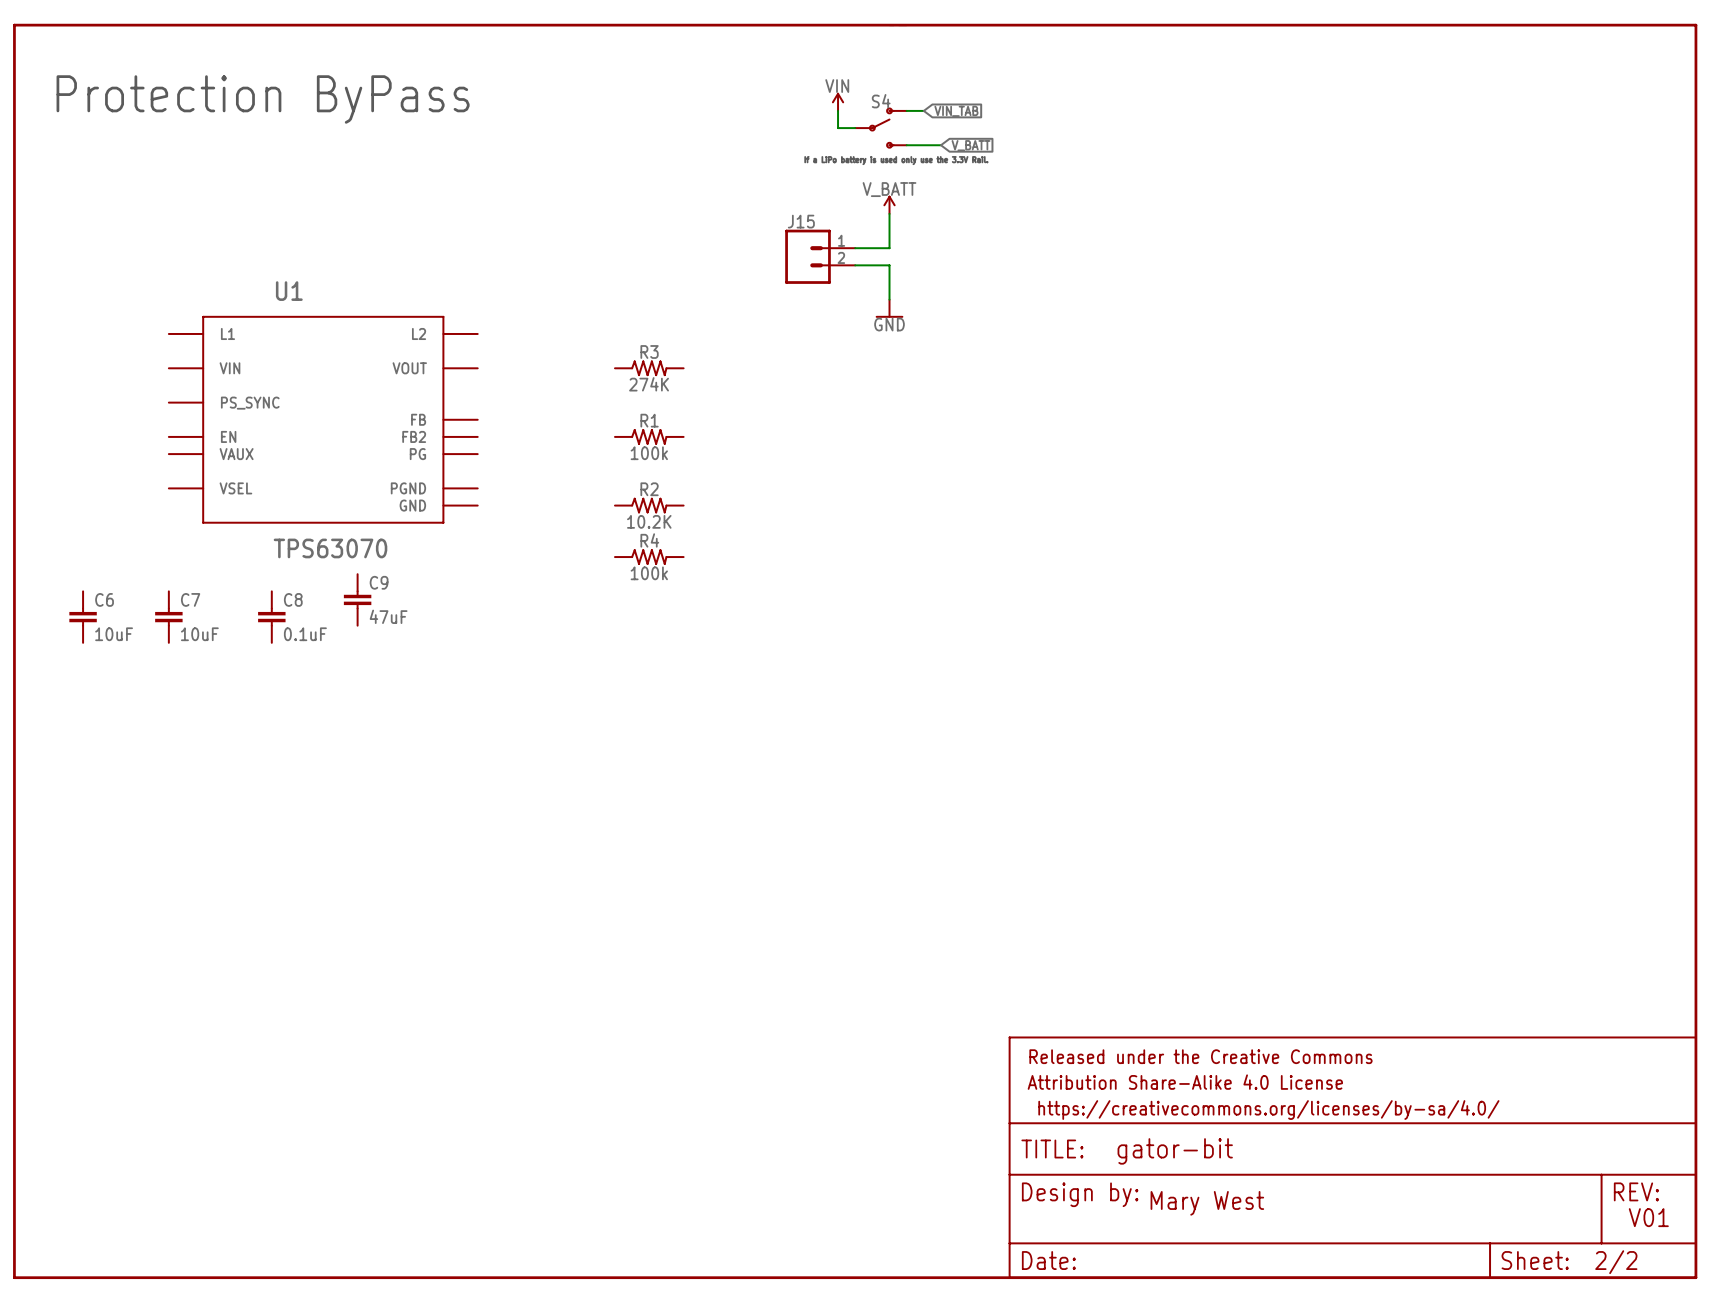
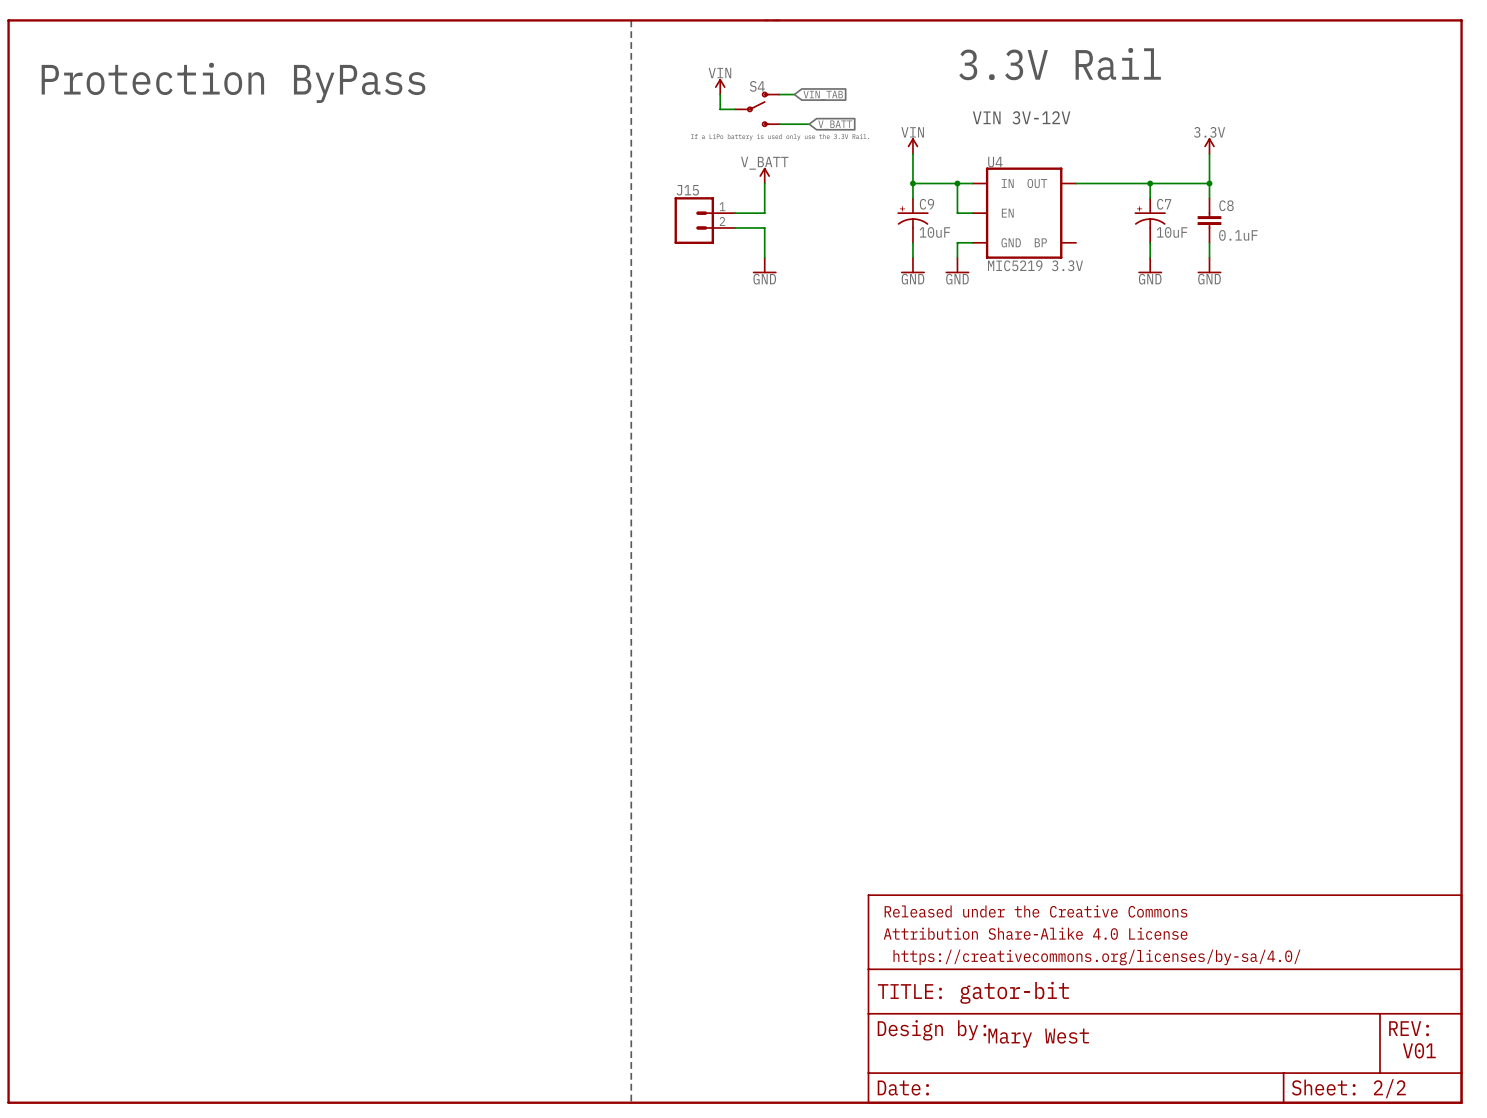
line: none -> (631, 20) (631, 1102)
text: none -> 3.3V Rail (1060, 64)
text: none -> VIN 3V-12V (1021, 117)
power symbol: none -> VIN (912, 146)
power symbol: none -> 3.3V (1209, 146)
wire: none -> (912, 153) (912, 198)
wire: none -> (1209, 153) (1209, 198)
wire: none -> (912, 183) (972, 183)
junction: none -> (912, 183)
wire: none -> (957, 183) (957, 213) (972, 213)
junction: none -> (957, 183)
wire: none -> (1076, 183) (1209, 183)
wire: none -> (1150, 183) (1150, 198)
junction: none -> (1150, 183)
junction: none -> (1209, 183)
U4: none -> MIC5219 3.3V (1024, 213)
wire: none -> (912, 242) (912, 257)
wire: none -> (972, 242) (957, 242) (957, 257)
wire: none -> (1150, 242) (1150, 257)
wire: none -> (1209, 242) (1209, 257)
power symbol: none -> GND (912, 265)
power symbol: none -> GND (957, 265)
power symbol: none -> GND (1150, 265)
power symbol: none -> GND (1209, 265)
R3: 274K (649, 368) -> none
U1: TPS63070 (323, 419) -> none
R1: 100k (649, 436) -> none
R2: 10.2K (649, 505) -> none
R4: 100k (649, 557) -> none
C9 symbol: [343, 574, 372, 626] -> [897, 198, 929, 243]
C7 symbol: [155, 591, 183, 643] -> [1134, 198, 1166, 243]
C9 value: 47uF (388, 616) -> 10uF (934, 232)
C6: 10uF (83, 617) -> none
C8 position: (271, 617) -> (1209, 220)

